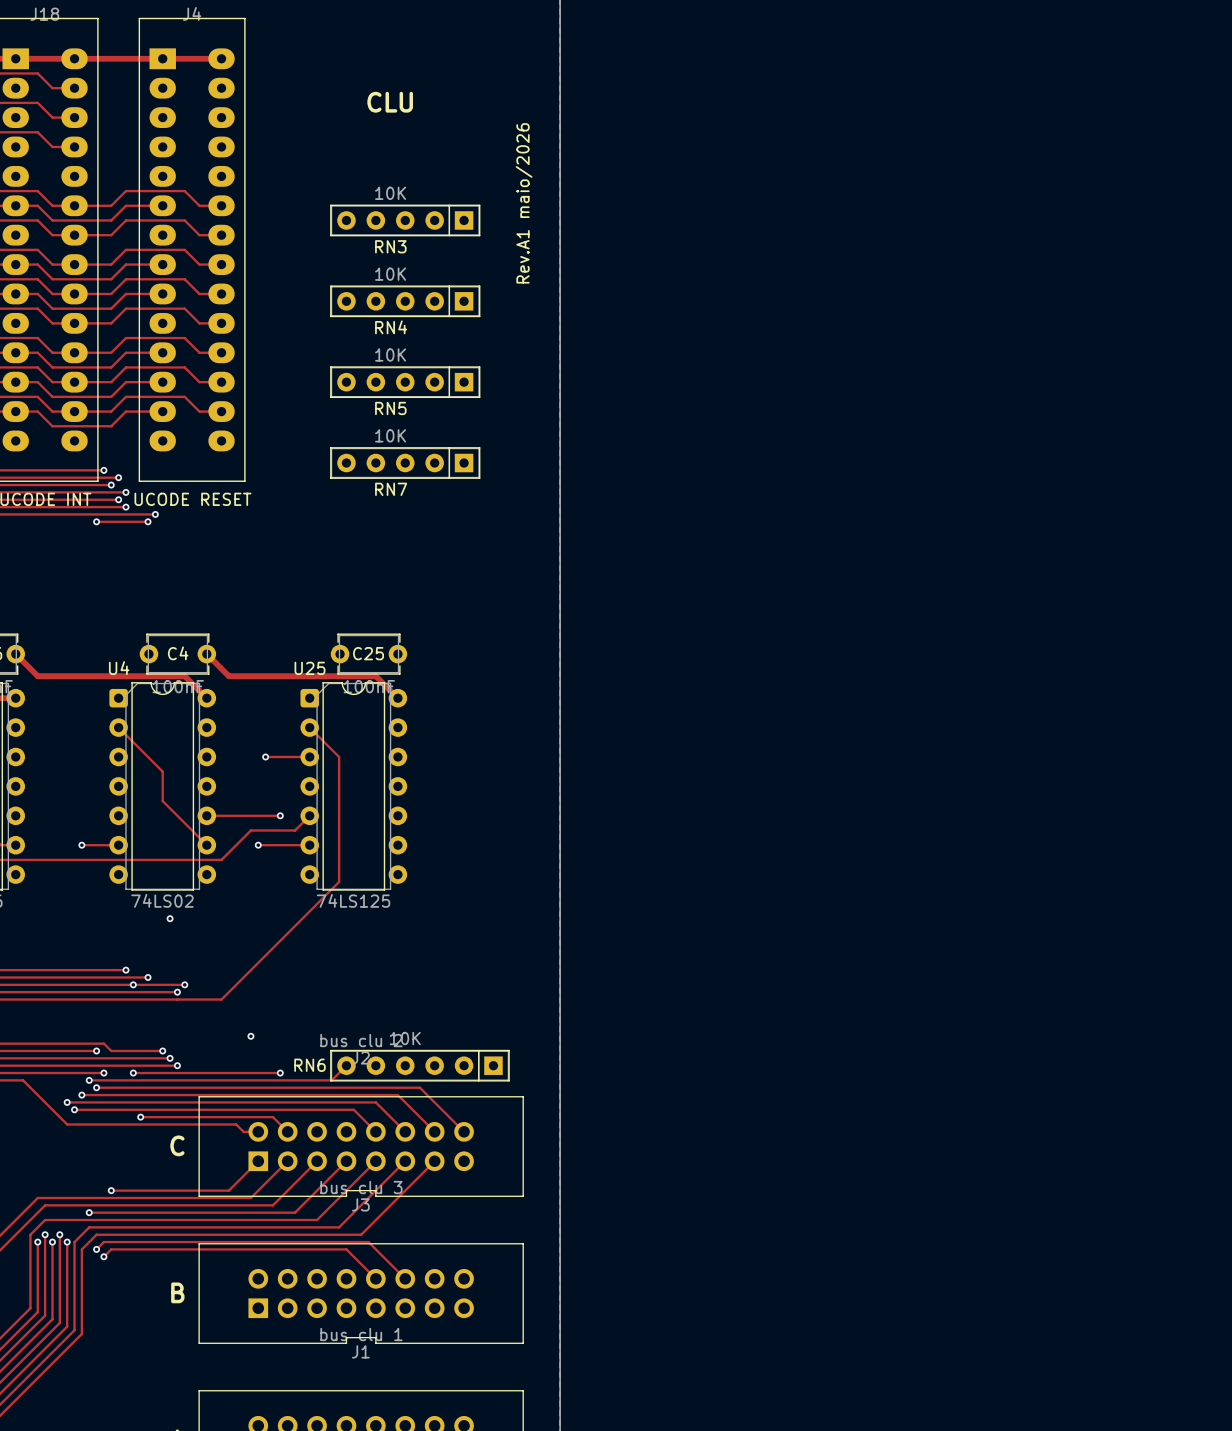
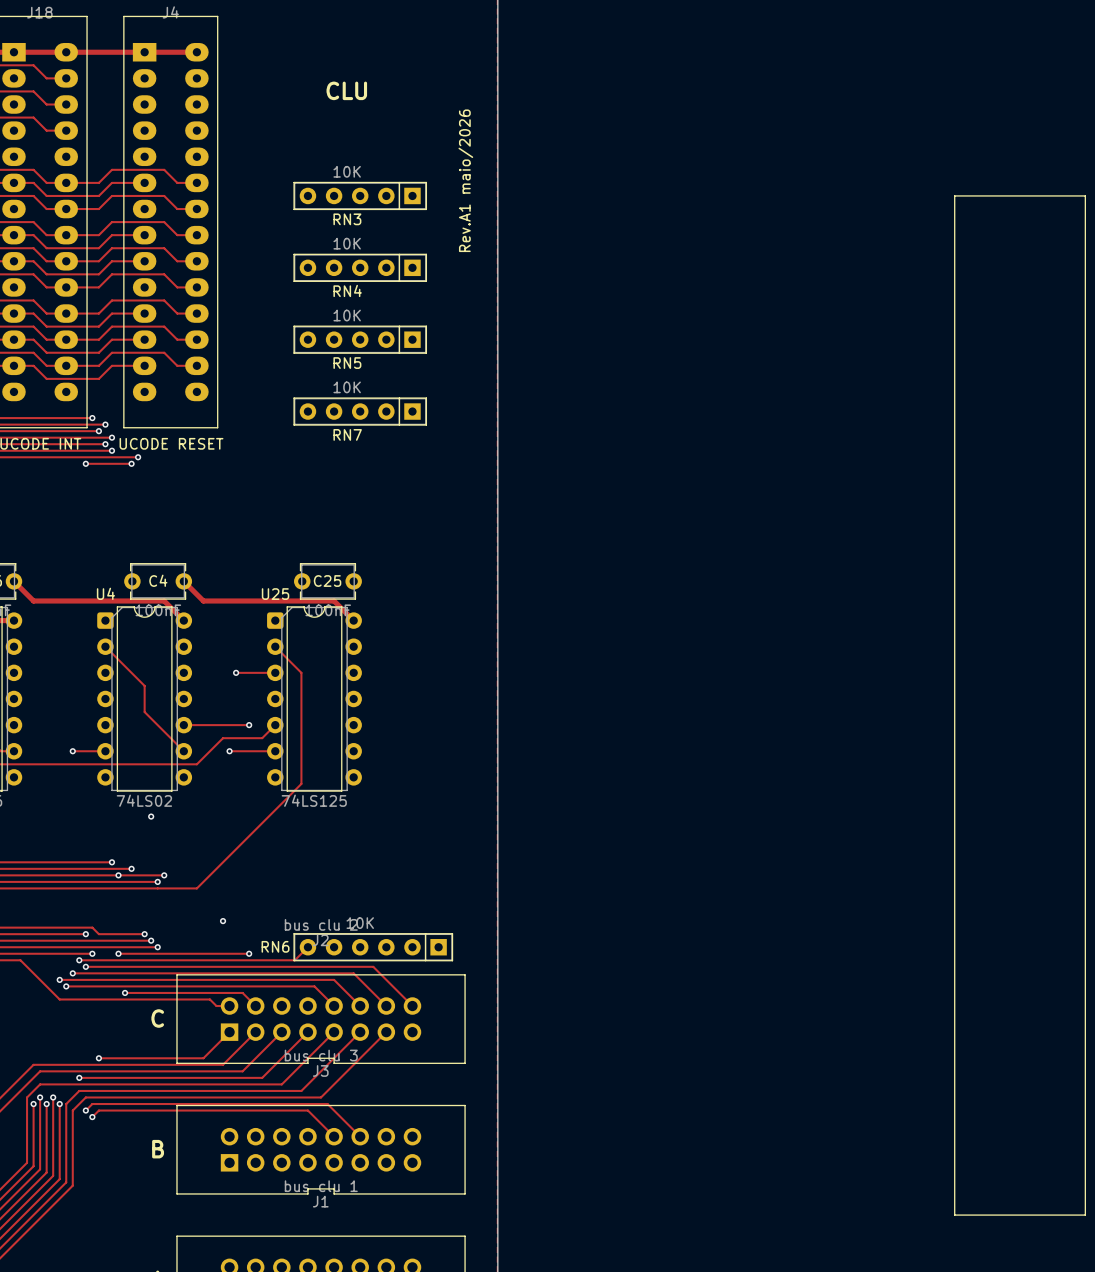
line: none -> (954, 195) (1085, 195) (1085, 1215) (954, 1215) (954, 195)

